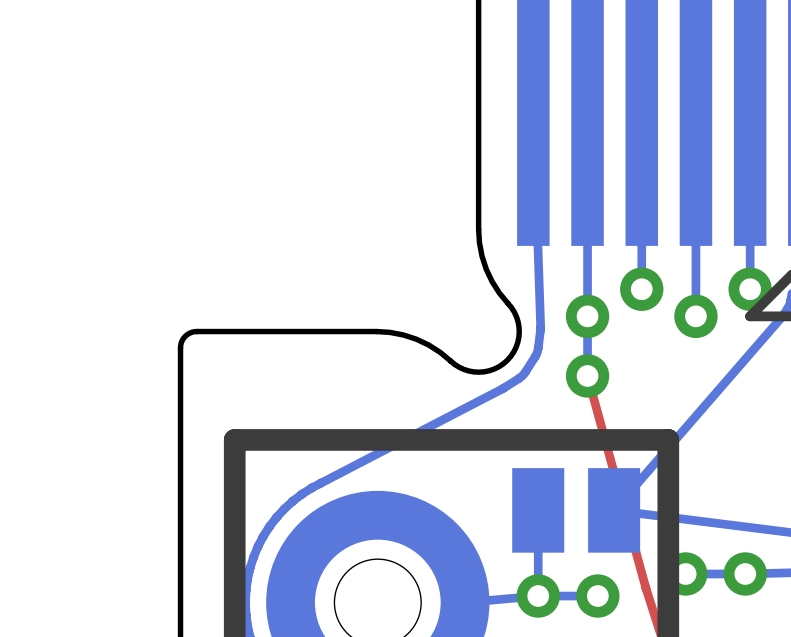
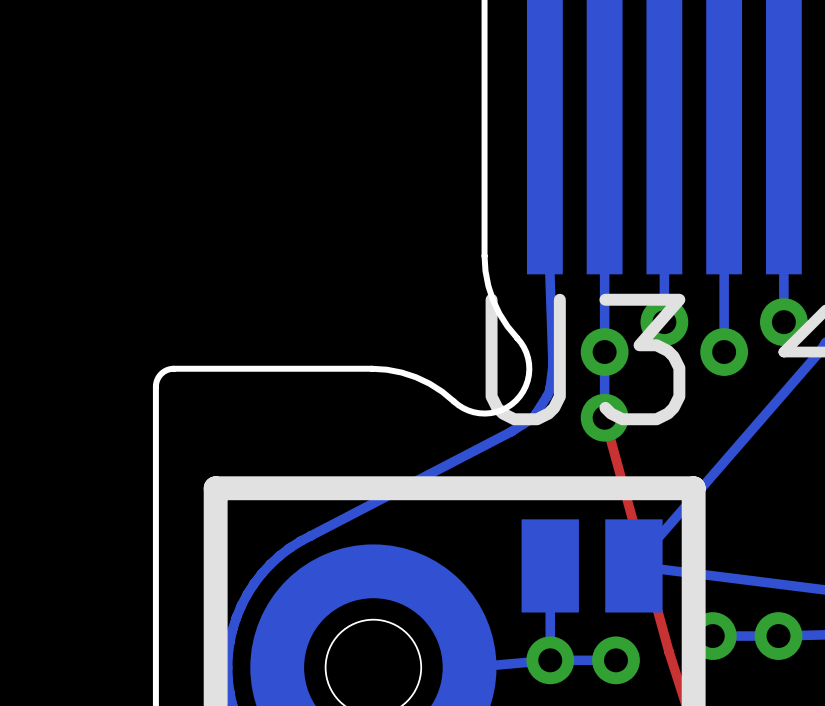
U3 name: none -> U3 (585, 359)

